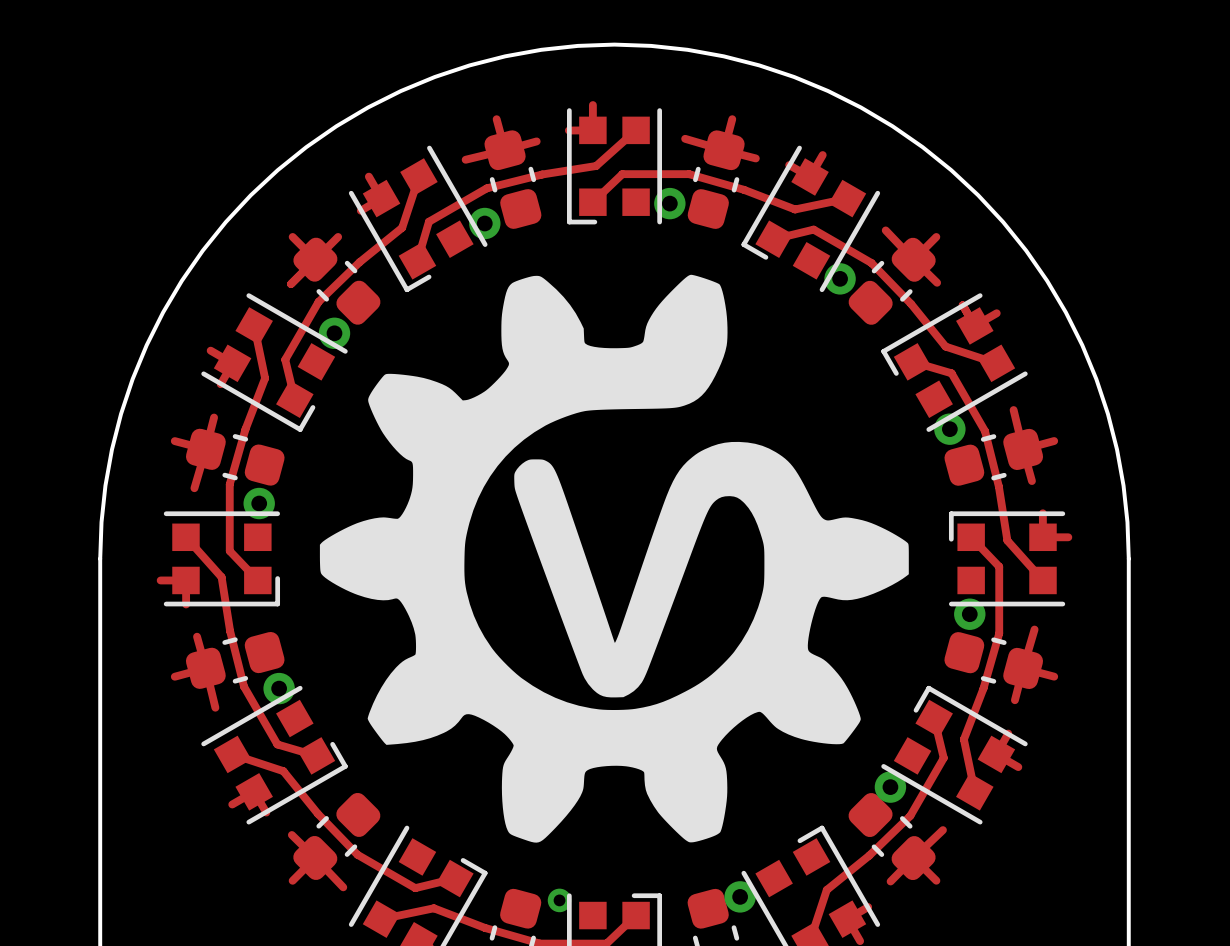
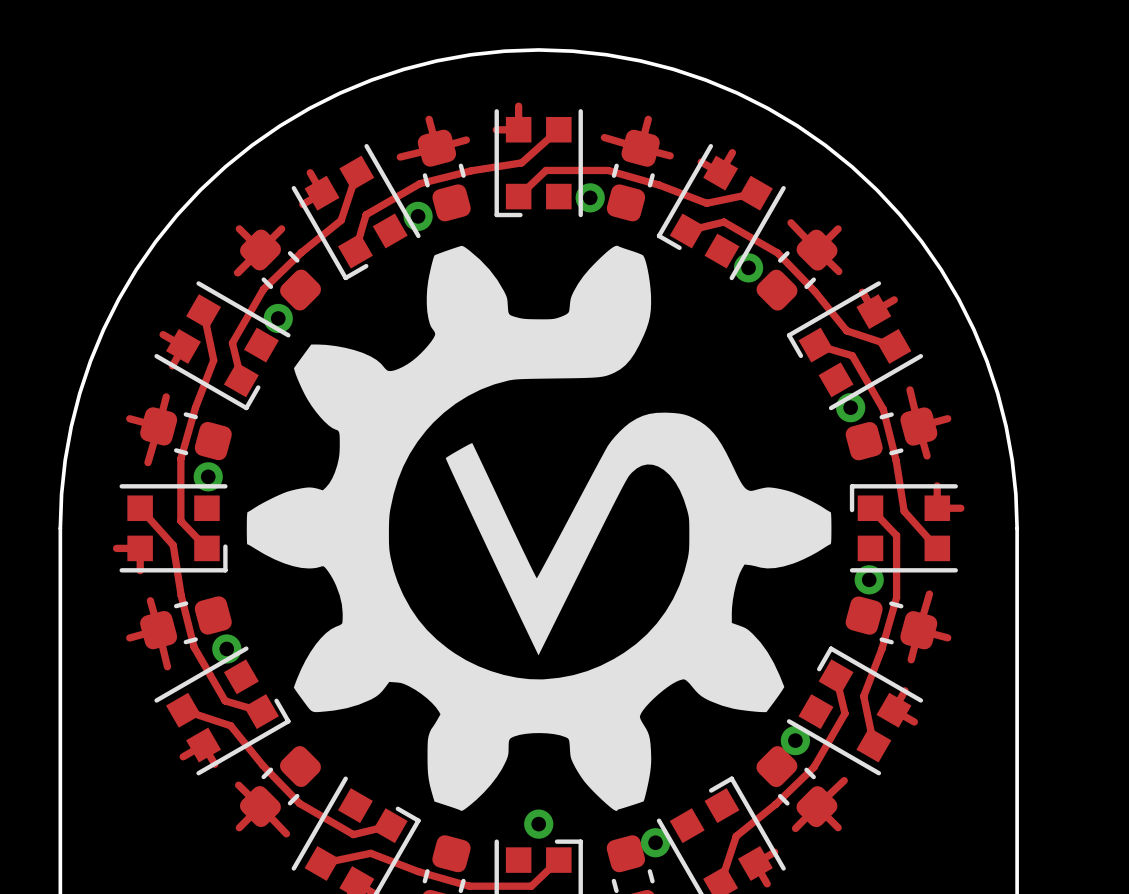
drawing shape: [319, 274, 909, 843] -> [246, 245, 832, 811]
via: none -> (538, 824)
via: (559, 900) -> none

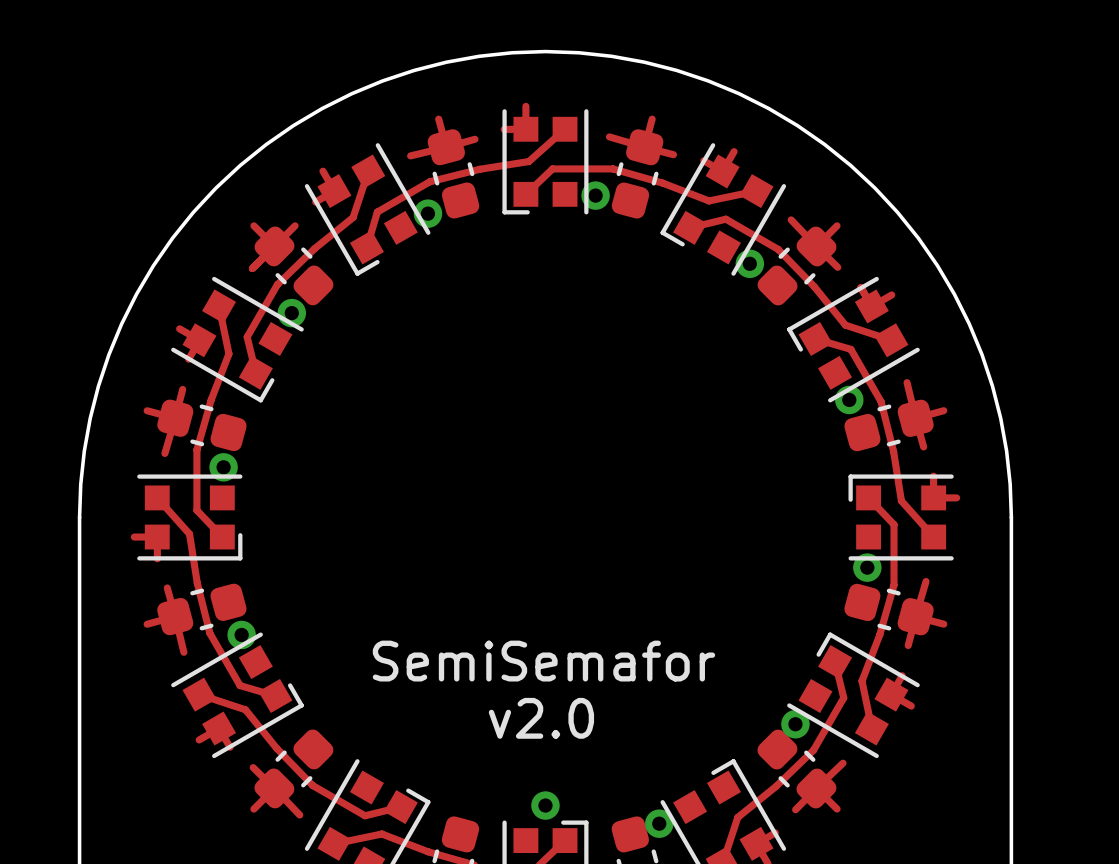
drawing: [246, 245, 832, 811] -> none
text: none -> SemiSemafor (543, 661)
text: none -> v2.0 (541, 718)

